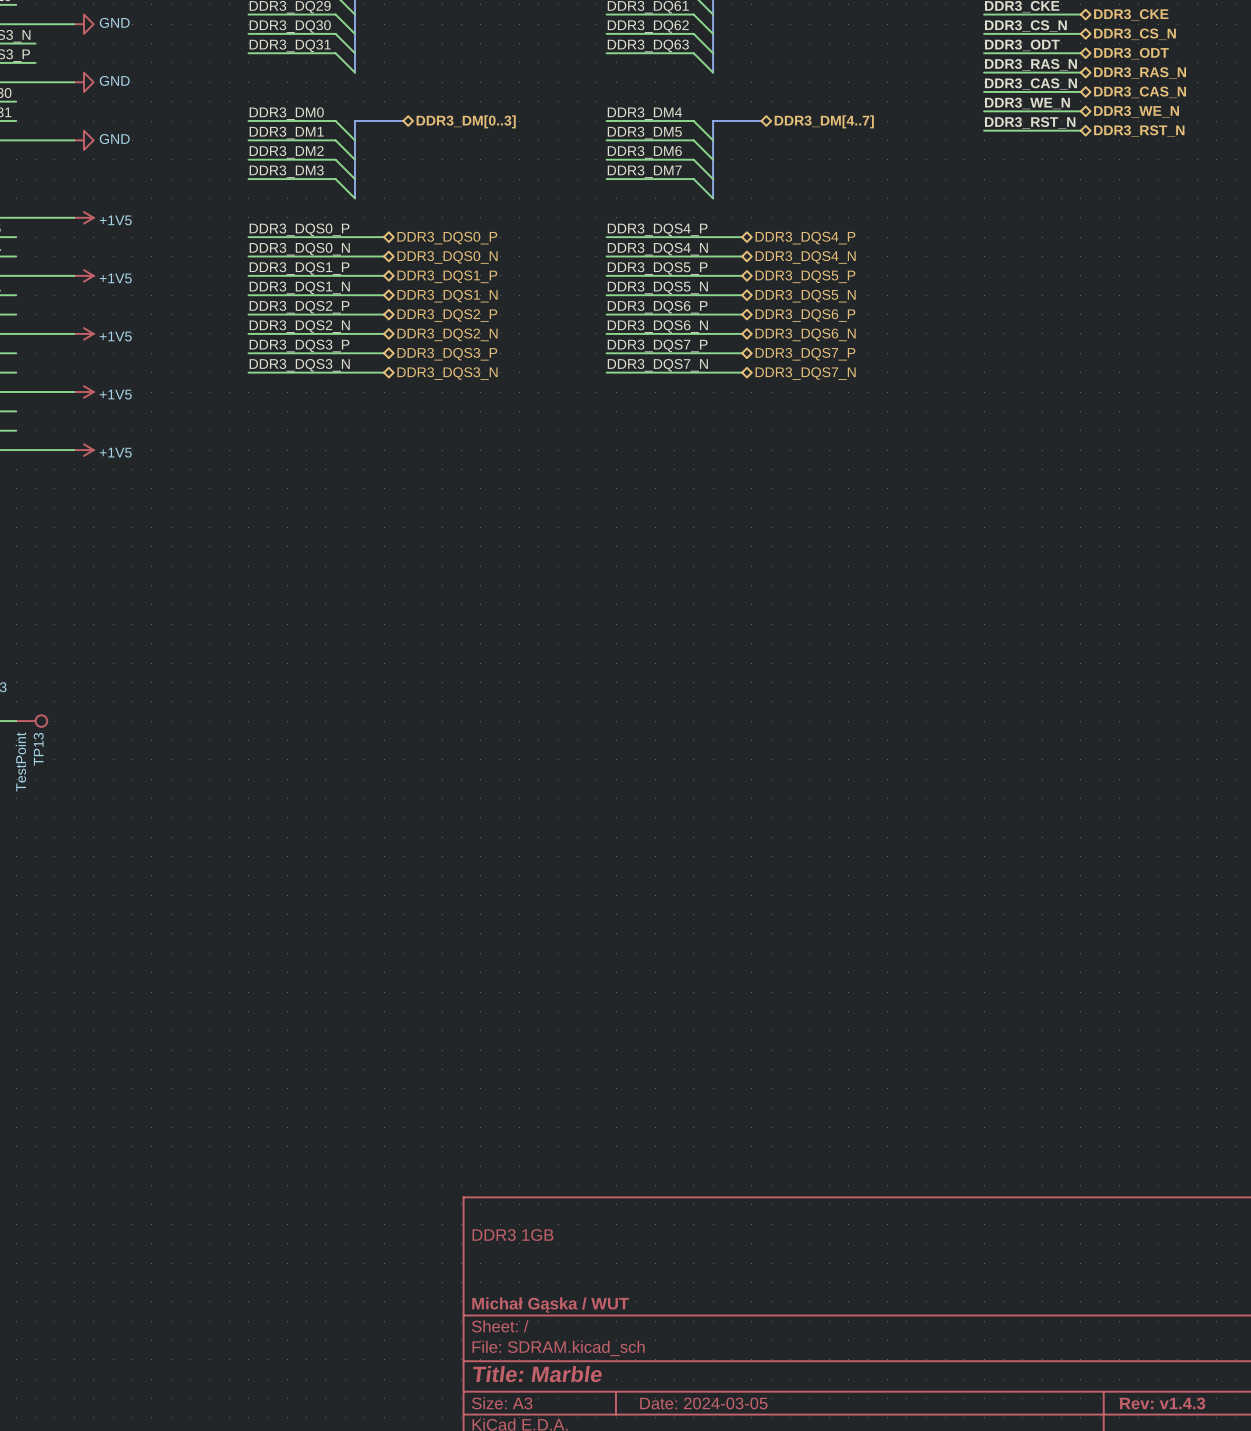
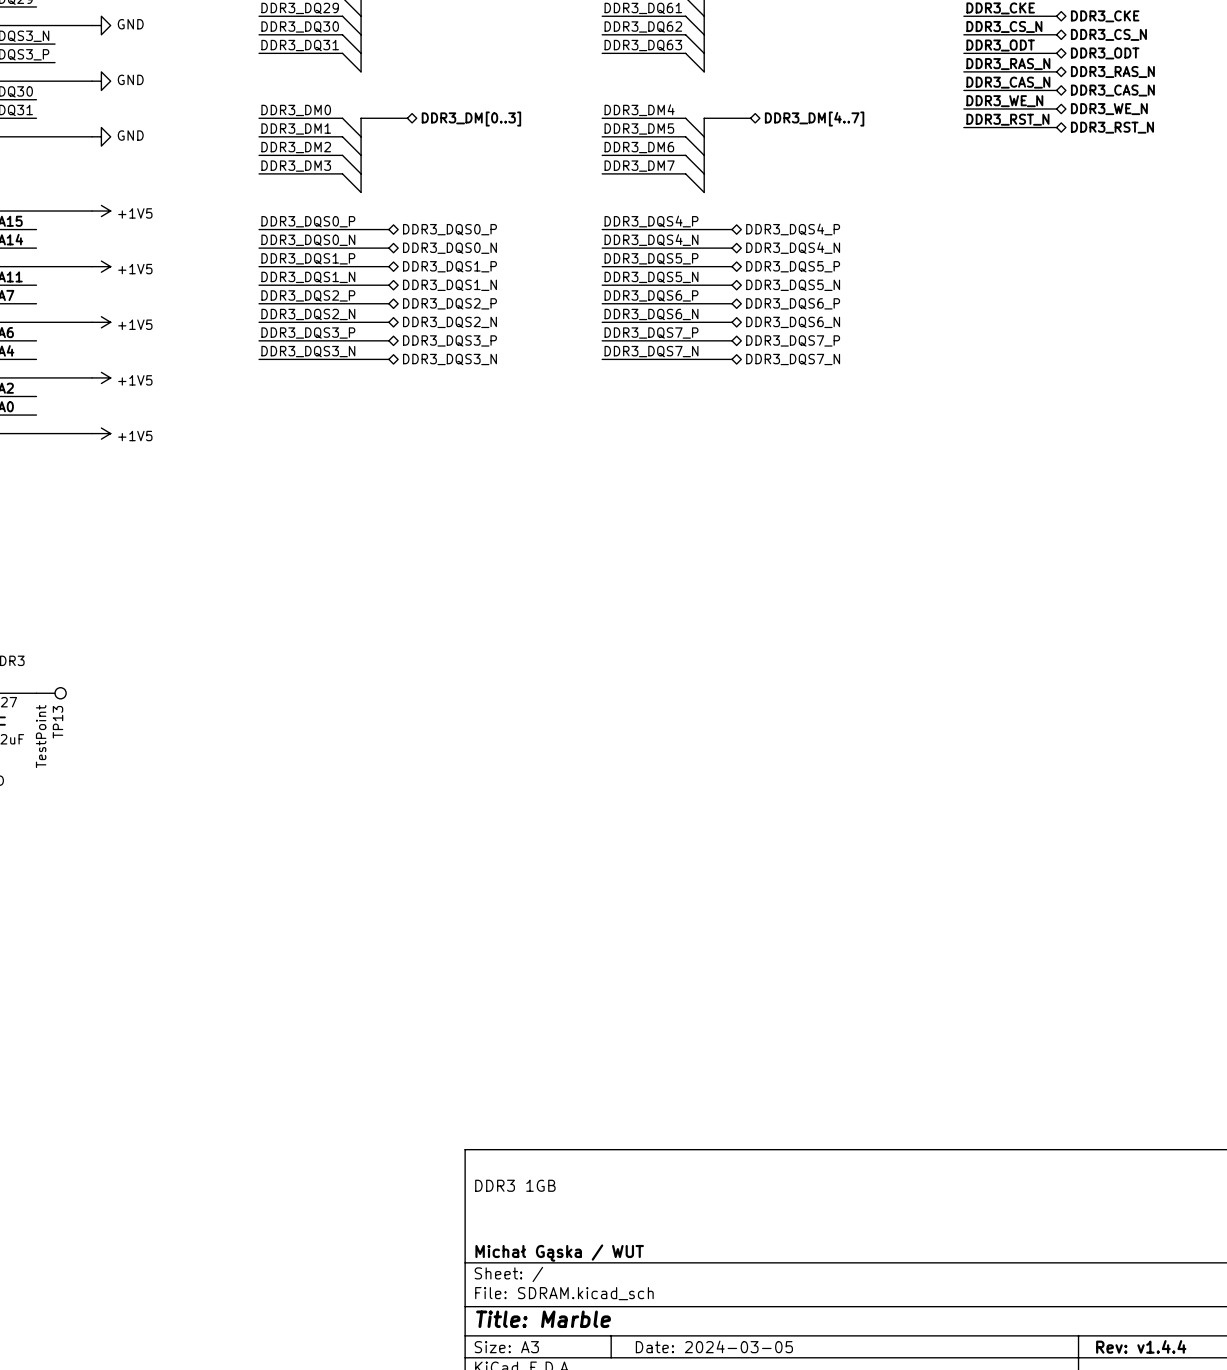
title block: Rev: v1.4.3 (1162, 1403) -> Rev: v1.4.4 (1141, 1346)

